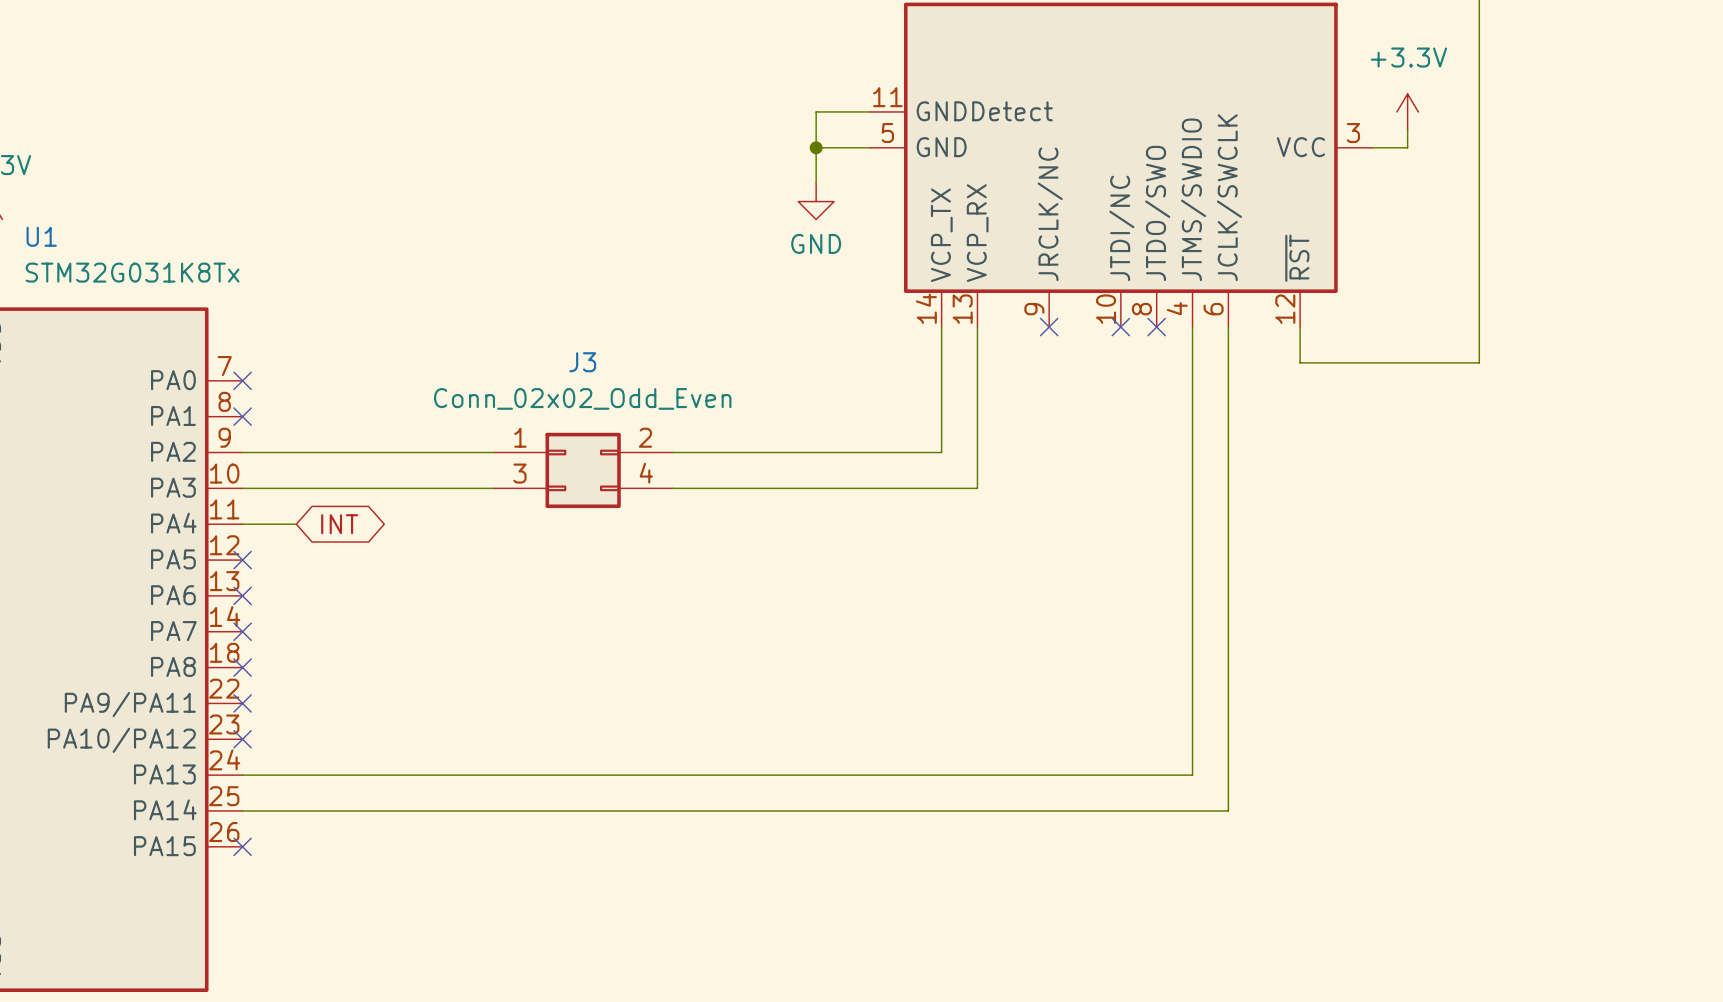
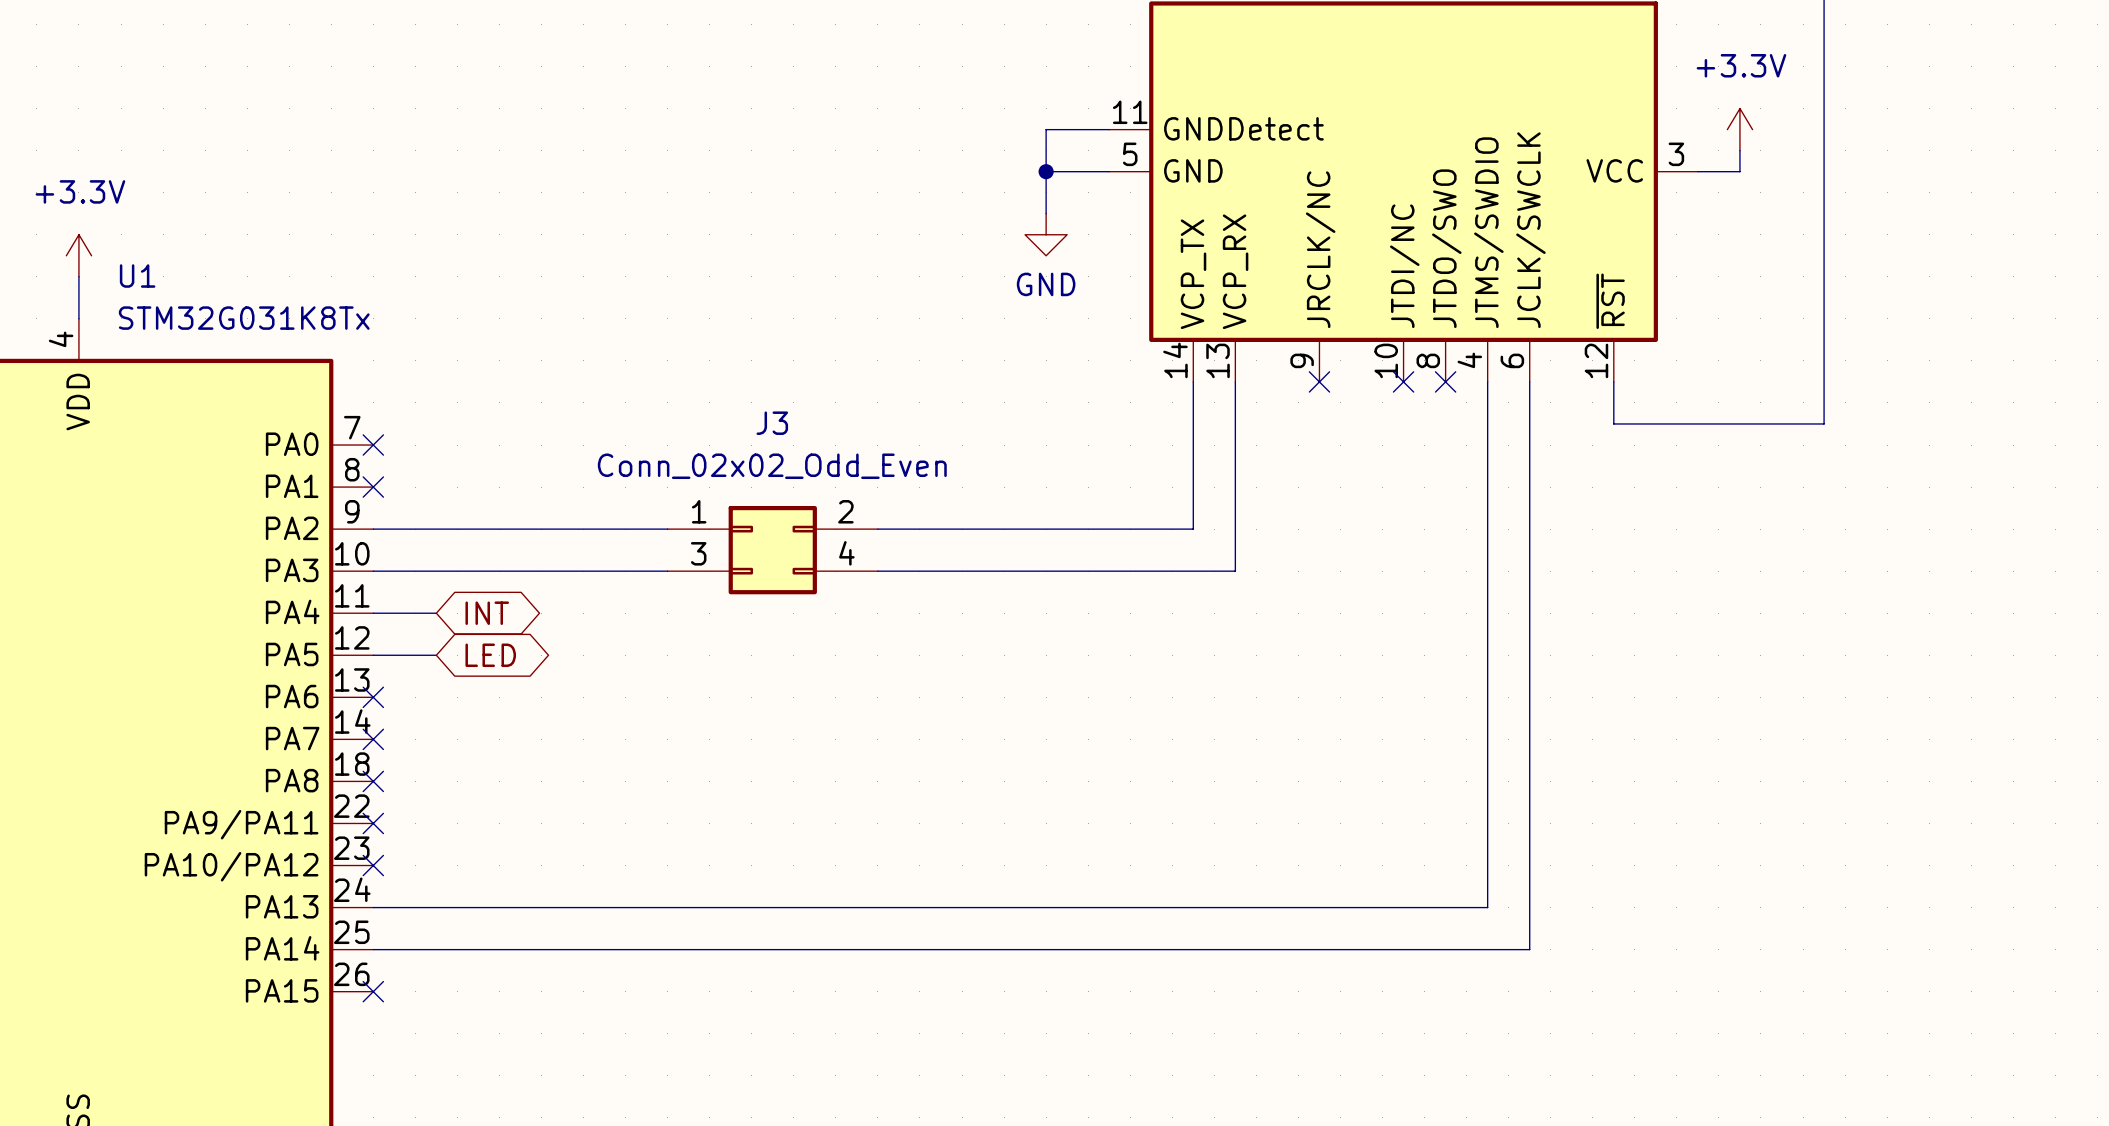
wire: none -> (373, 655) (436, 655)
no-connect mark: (242, 560) -> none
global label: none -> LED (490, 655)

